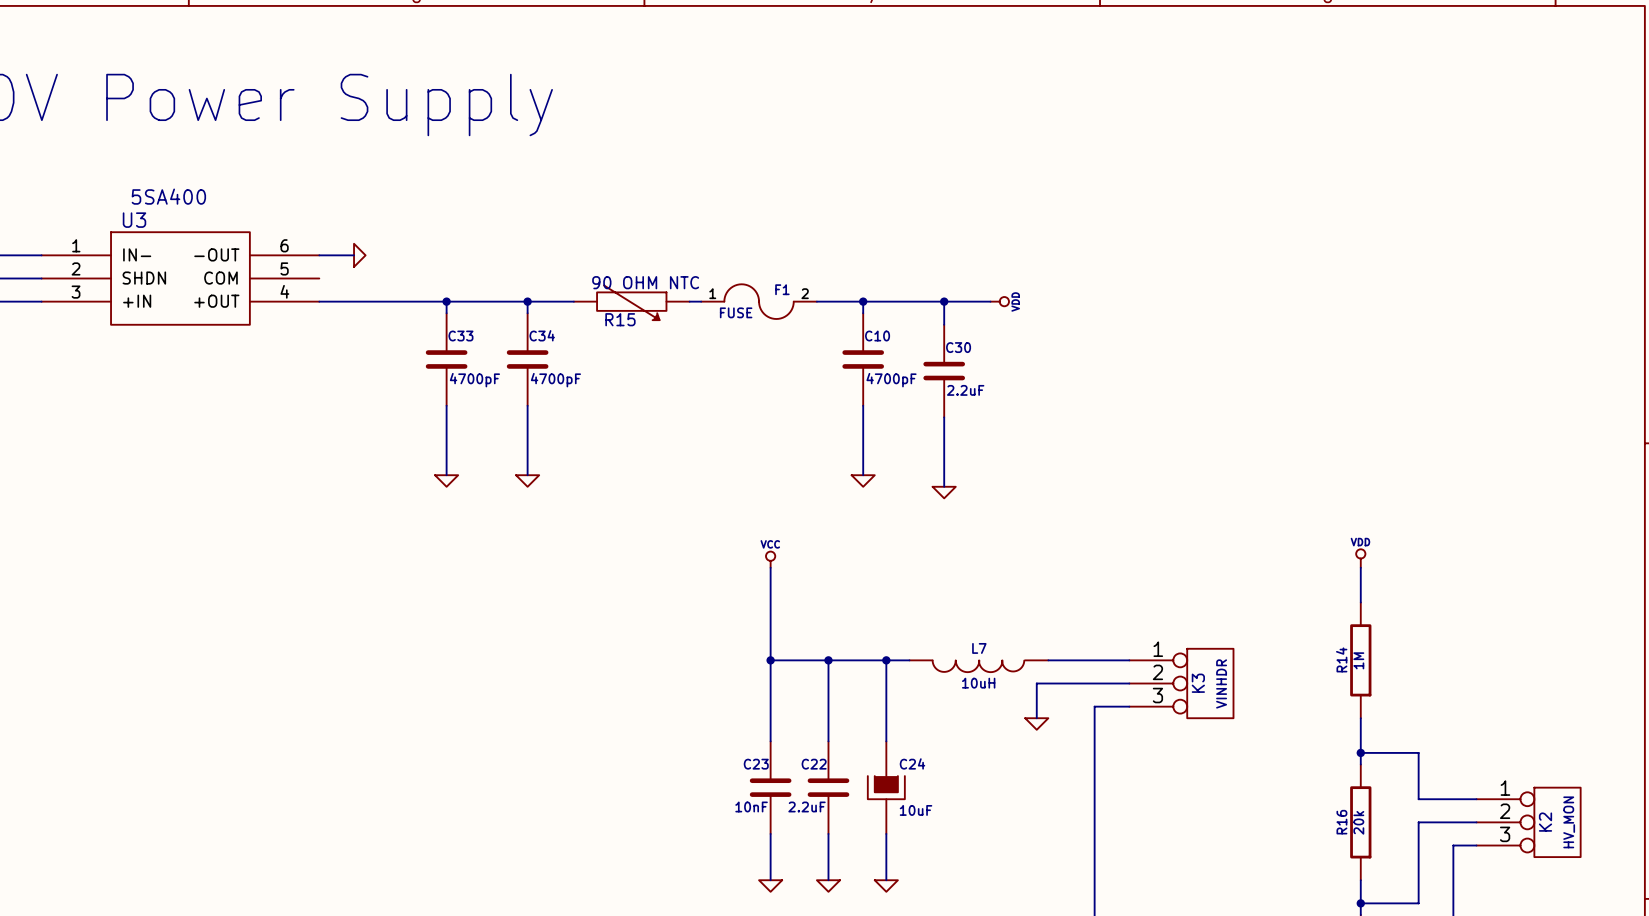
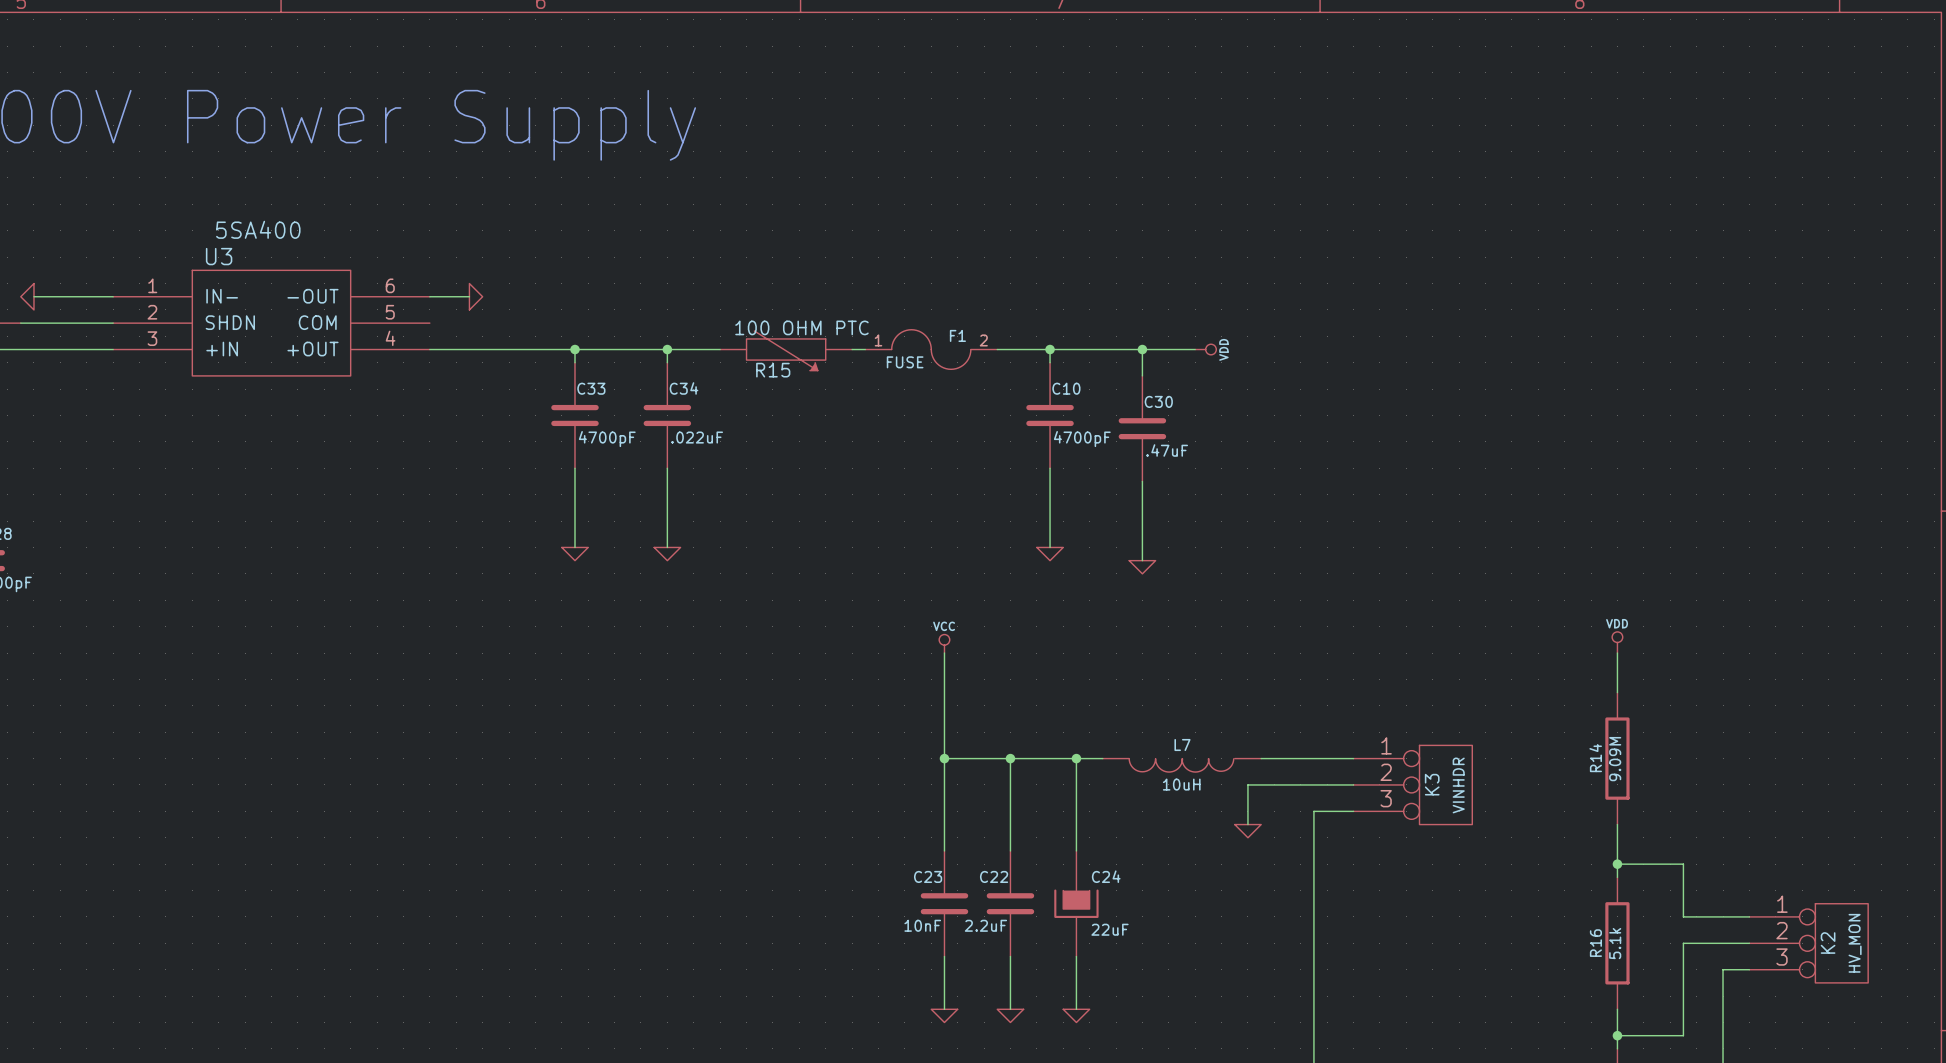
R15 value: 90 OHM NTC (645, 282) -> 100 OHM PTC (801, 327)
C34 value: 4700pF (555, 380) -> .022uF (697, 437)
C30 value: 2.2uF (965, 390) -> .47uF (1167, 450)
R14 value: 1M (1358, 660) -> 9.09M (1615, 759)
C24 value: 10uF (916, 810) -> 22uF (1110, 929)
R16 value: 20k (1358, 822) -> 5.1k (1615, 943)

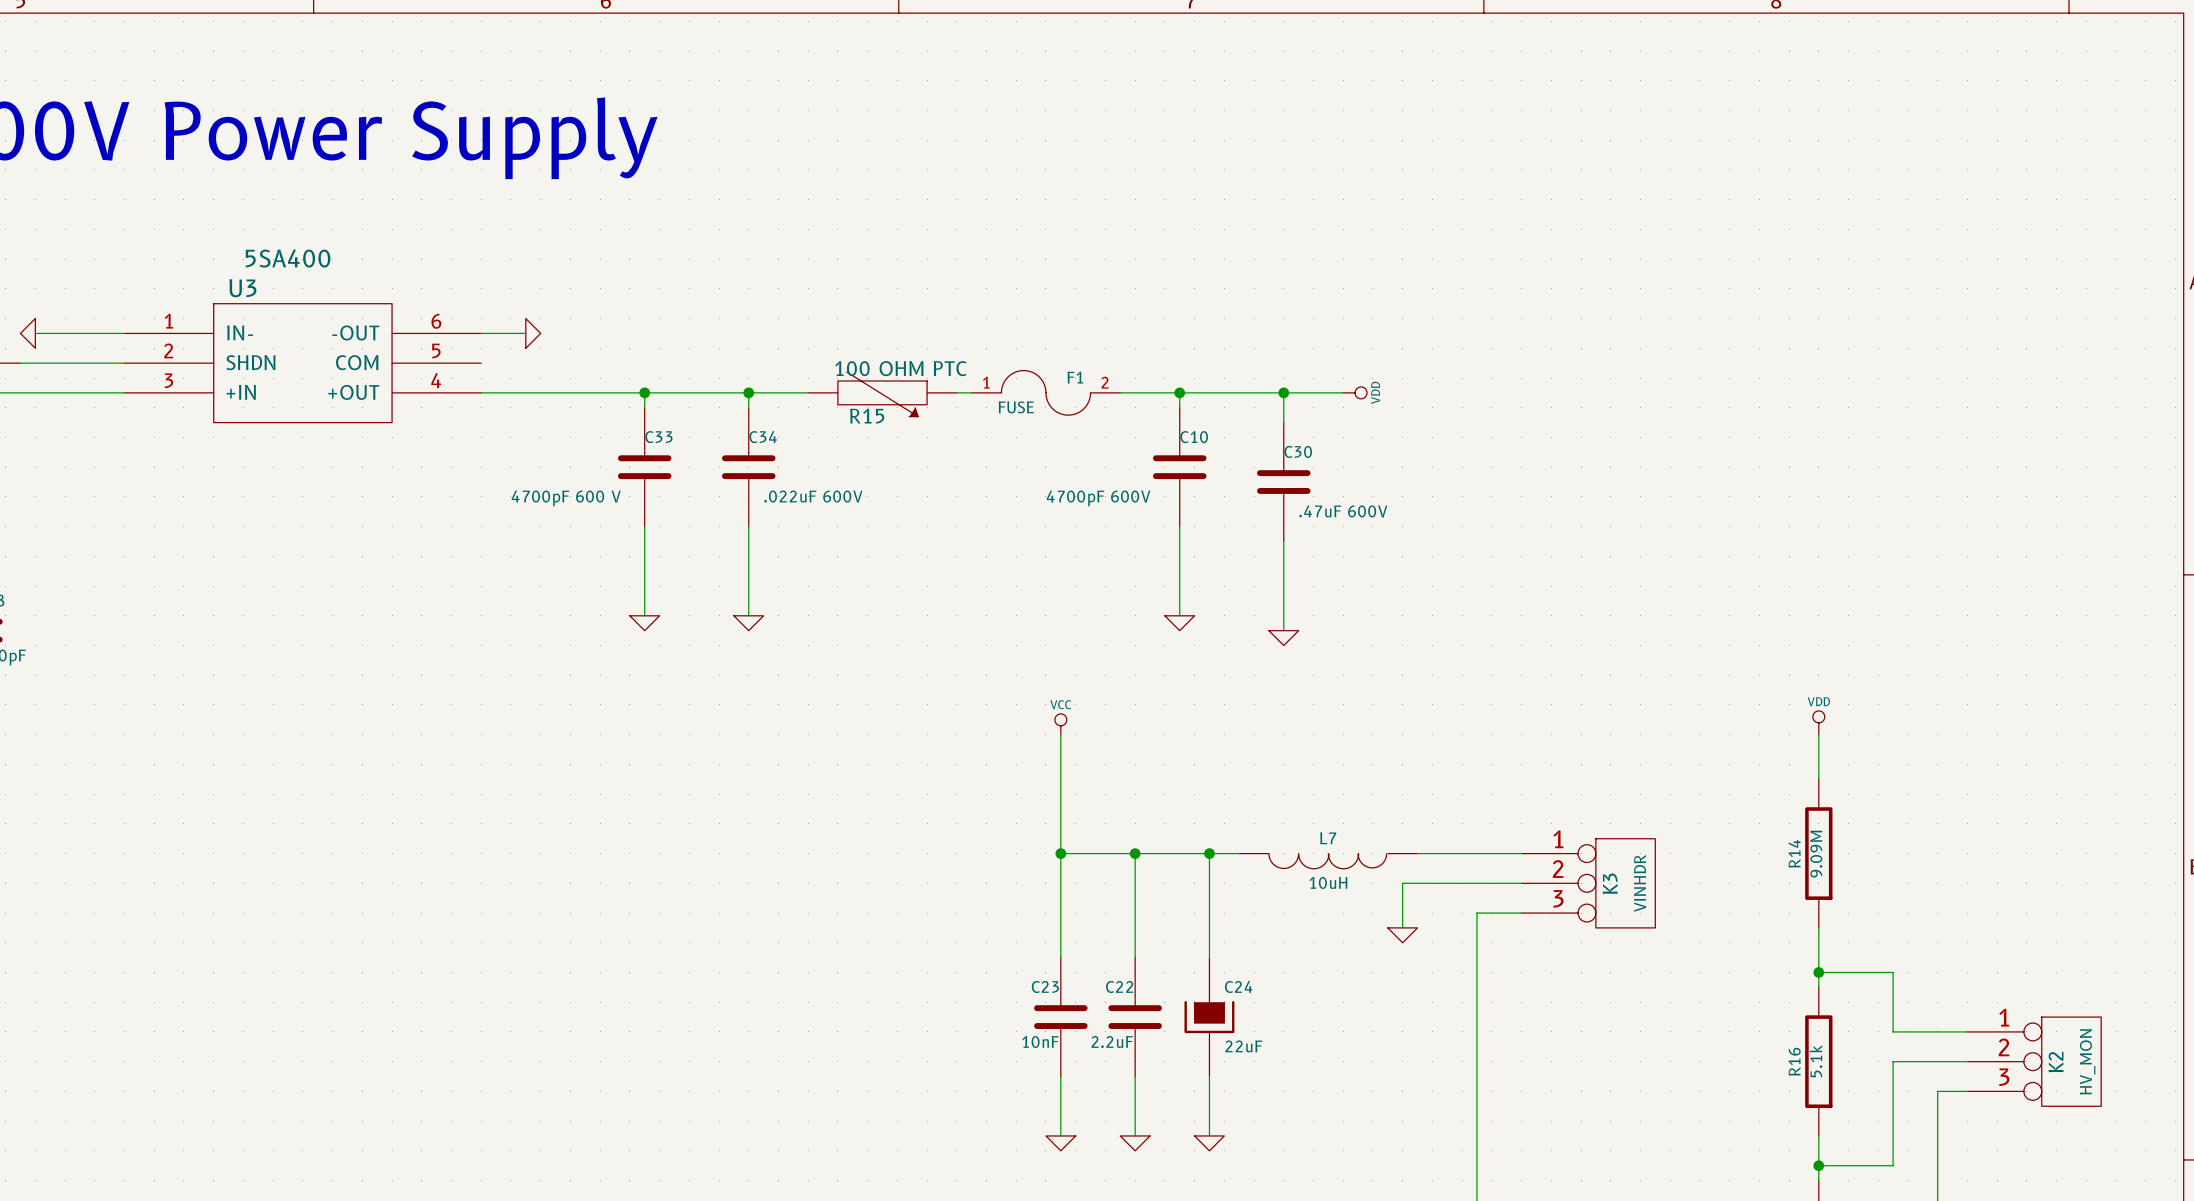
C34 value: .022uF (697, 437) -> .022uF 600V (813, 496)
C33 value: 4700pF (607, 439) -> 4700pF 600 V (566, 498)
C10 value: 4700pF (1082, 439) -> 4700pF 600V (1098, 498)
C30 value: .47uF (1167, 450) -> .47uF 600V (1343, 511)

